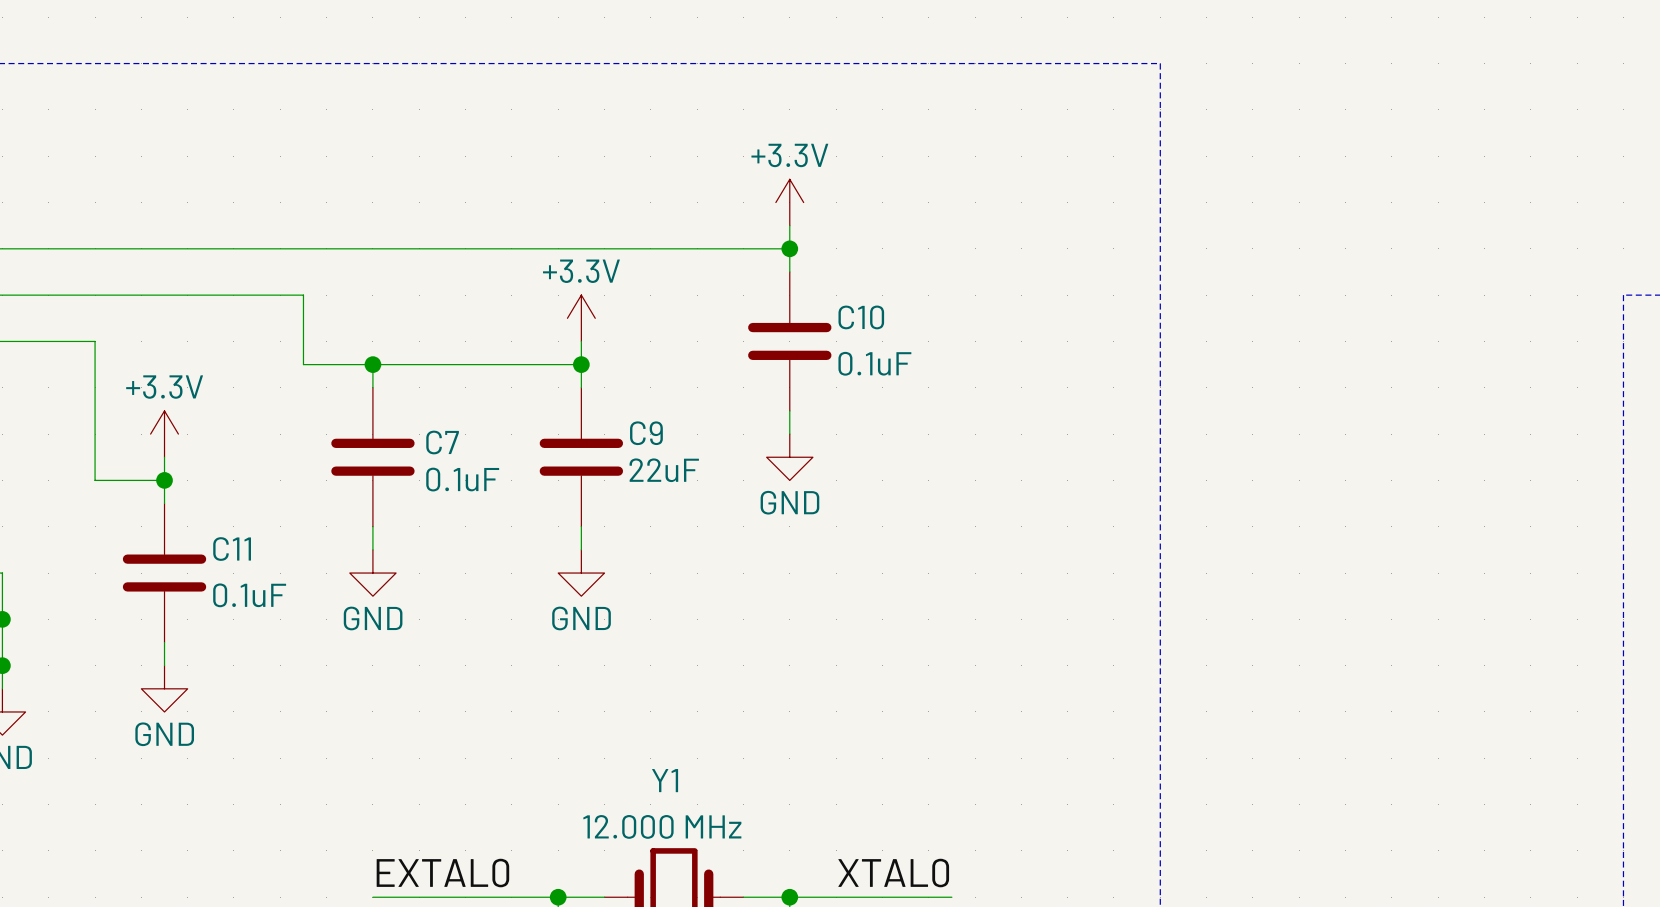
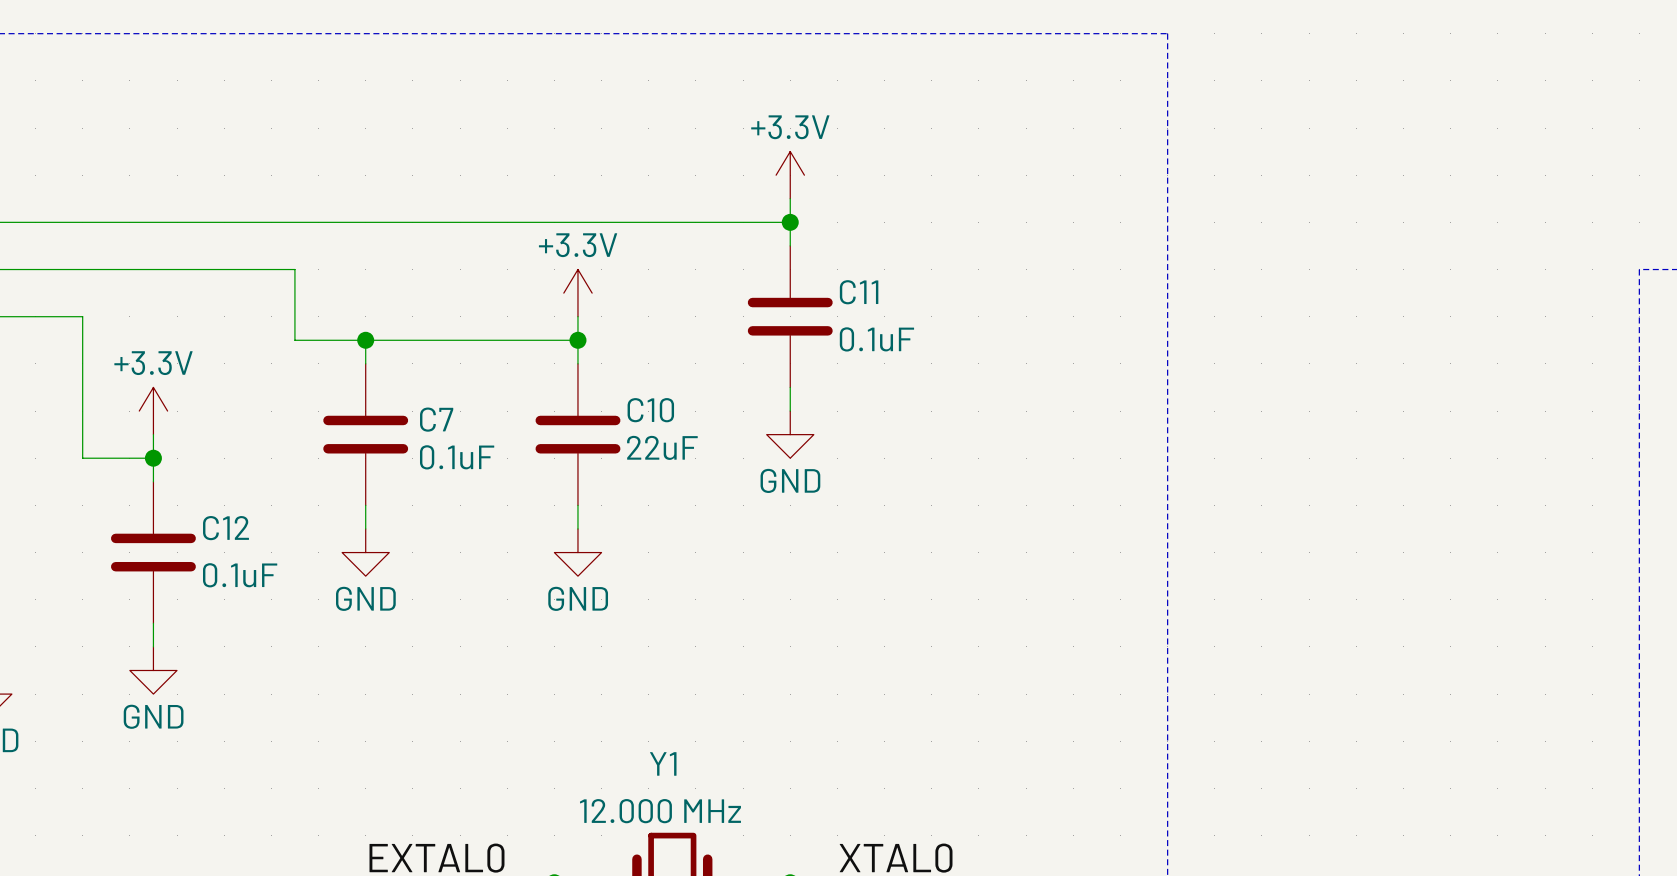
C10 name: C10 (861, 317) -> C11 (859, 292)
C9 name: C9 (646, 433) -> C10 (650, 410)
C11 name: C11 (232, 549) -> C12 (225, 528)

